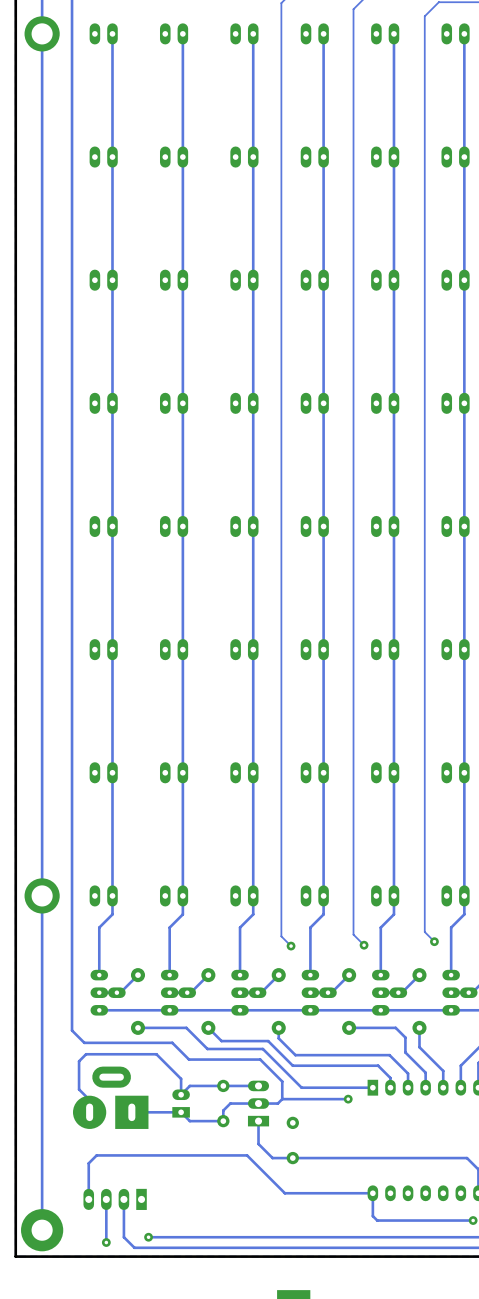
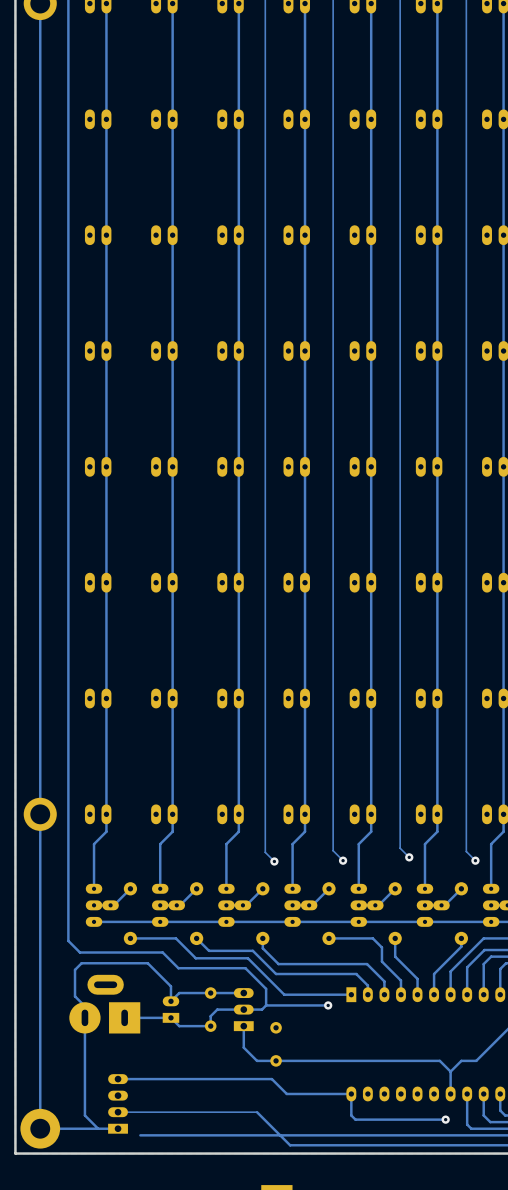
track: none -> (84, 1017) (84, 1115) (98, 1128)
track: (304, 1193) (284, 1193) (247, 1155) (96, 1155) (88, 1163) (88, 1199) -> (286, 1093) (271, 1079) (118, 1079)
track: (106, 1199) (106, 1242) -> none
part rotation: 0° (115, 1199) -> 90° clockwise (118, 1103)
track: (123, 1199) (123, 1237) (134, 1247) (307, 1247) -> (118, 1112) (257, 1112) (290, 1145)
track: none -> (118, 1128) (40, 1128)
via: (148, 1237) -> none
via: (106, 1242) -> none

